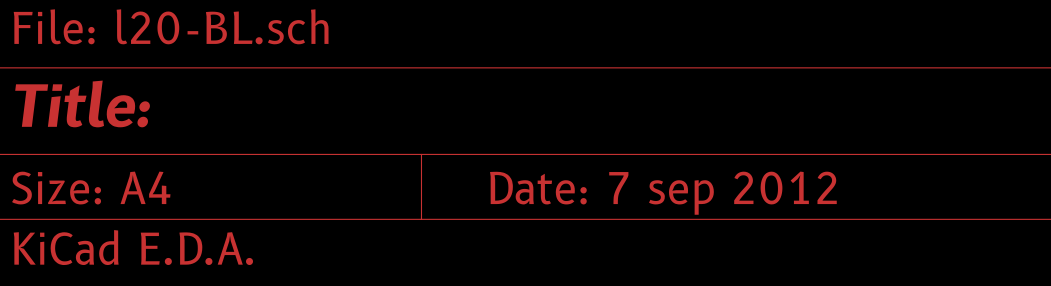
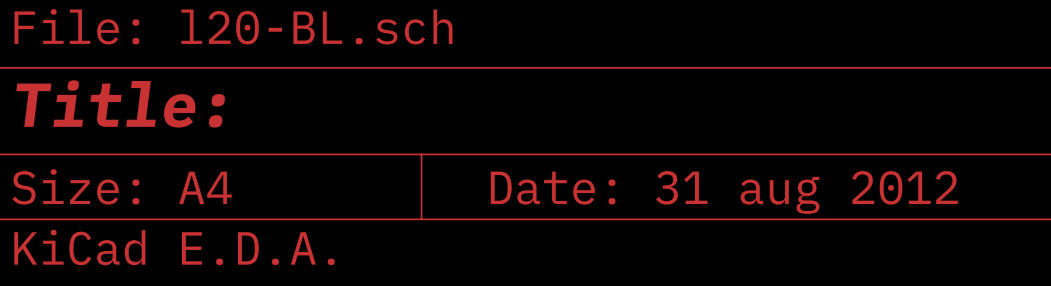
title block: Date: 7 sep 2012 (663, 193) -> Date: 31 aug 2012 (724, 192)

